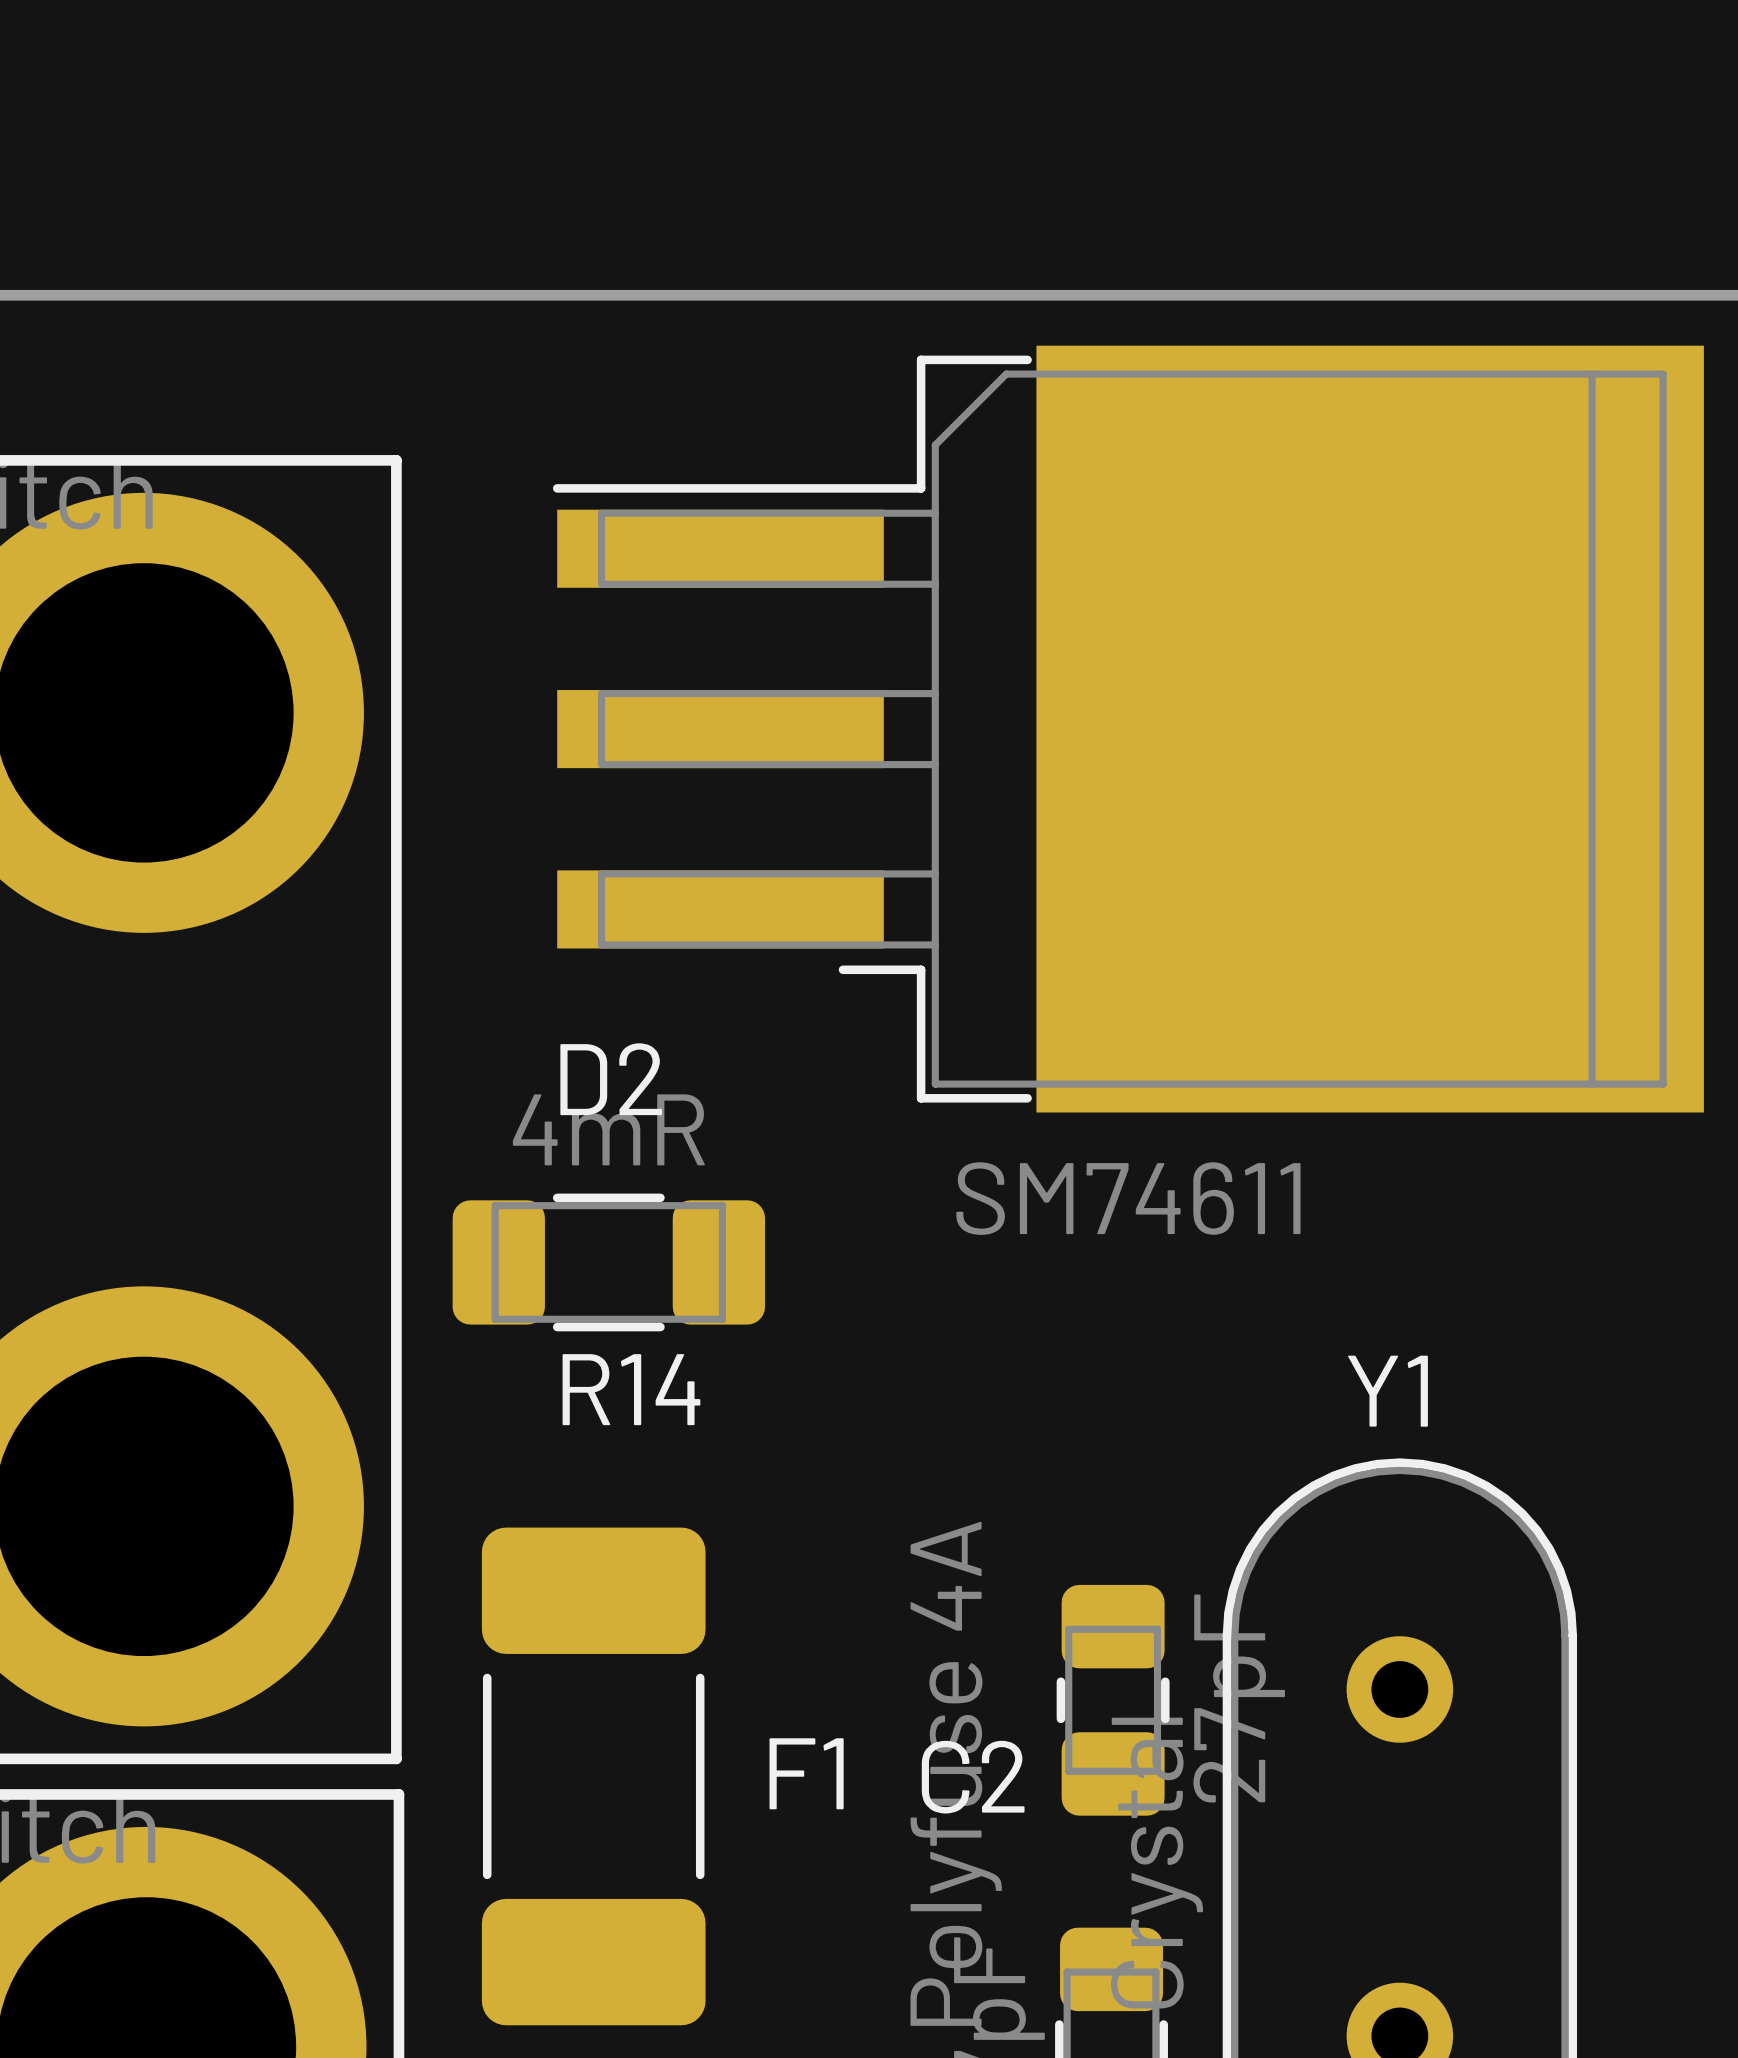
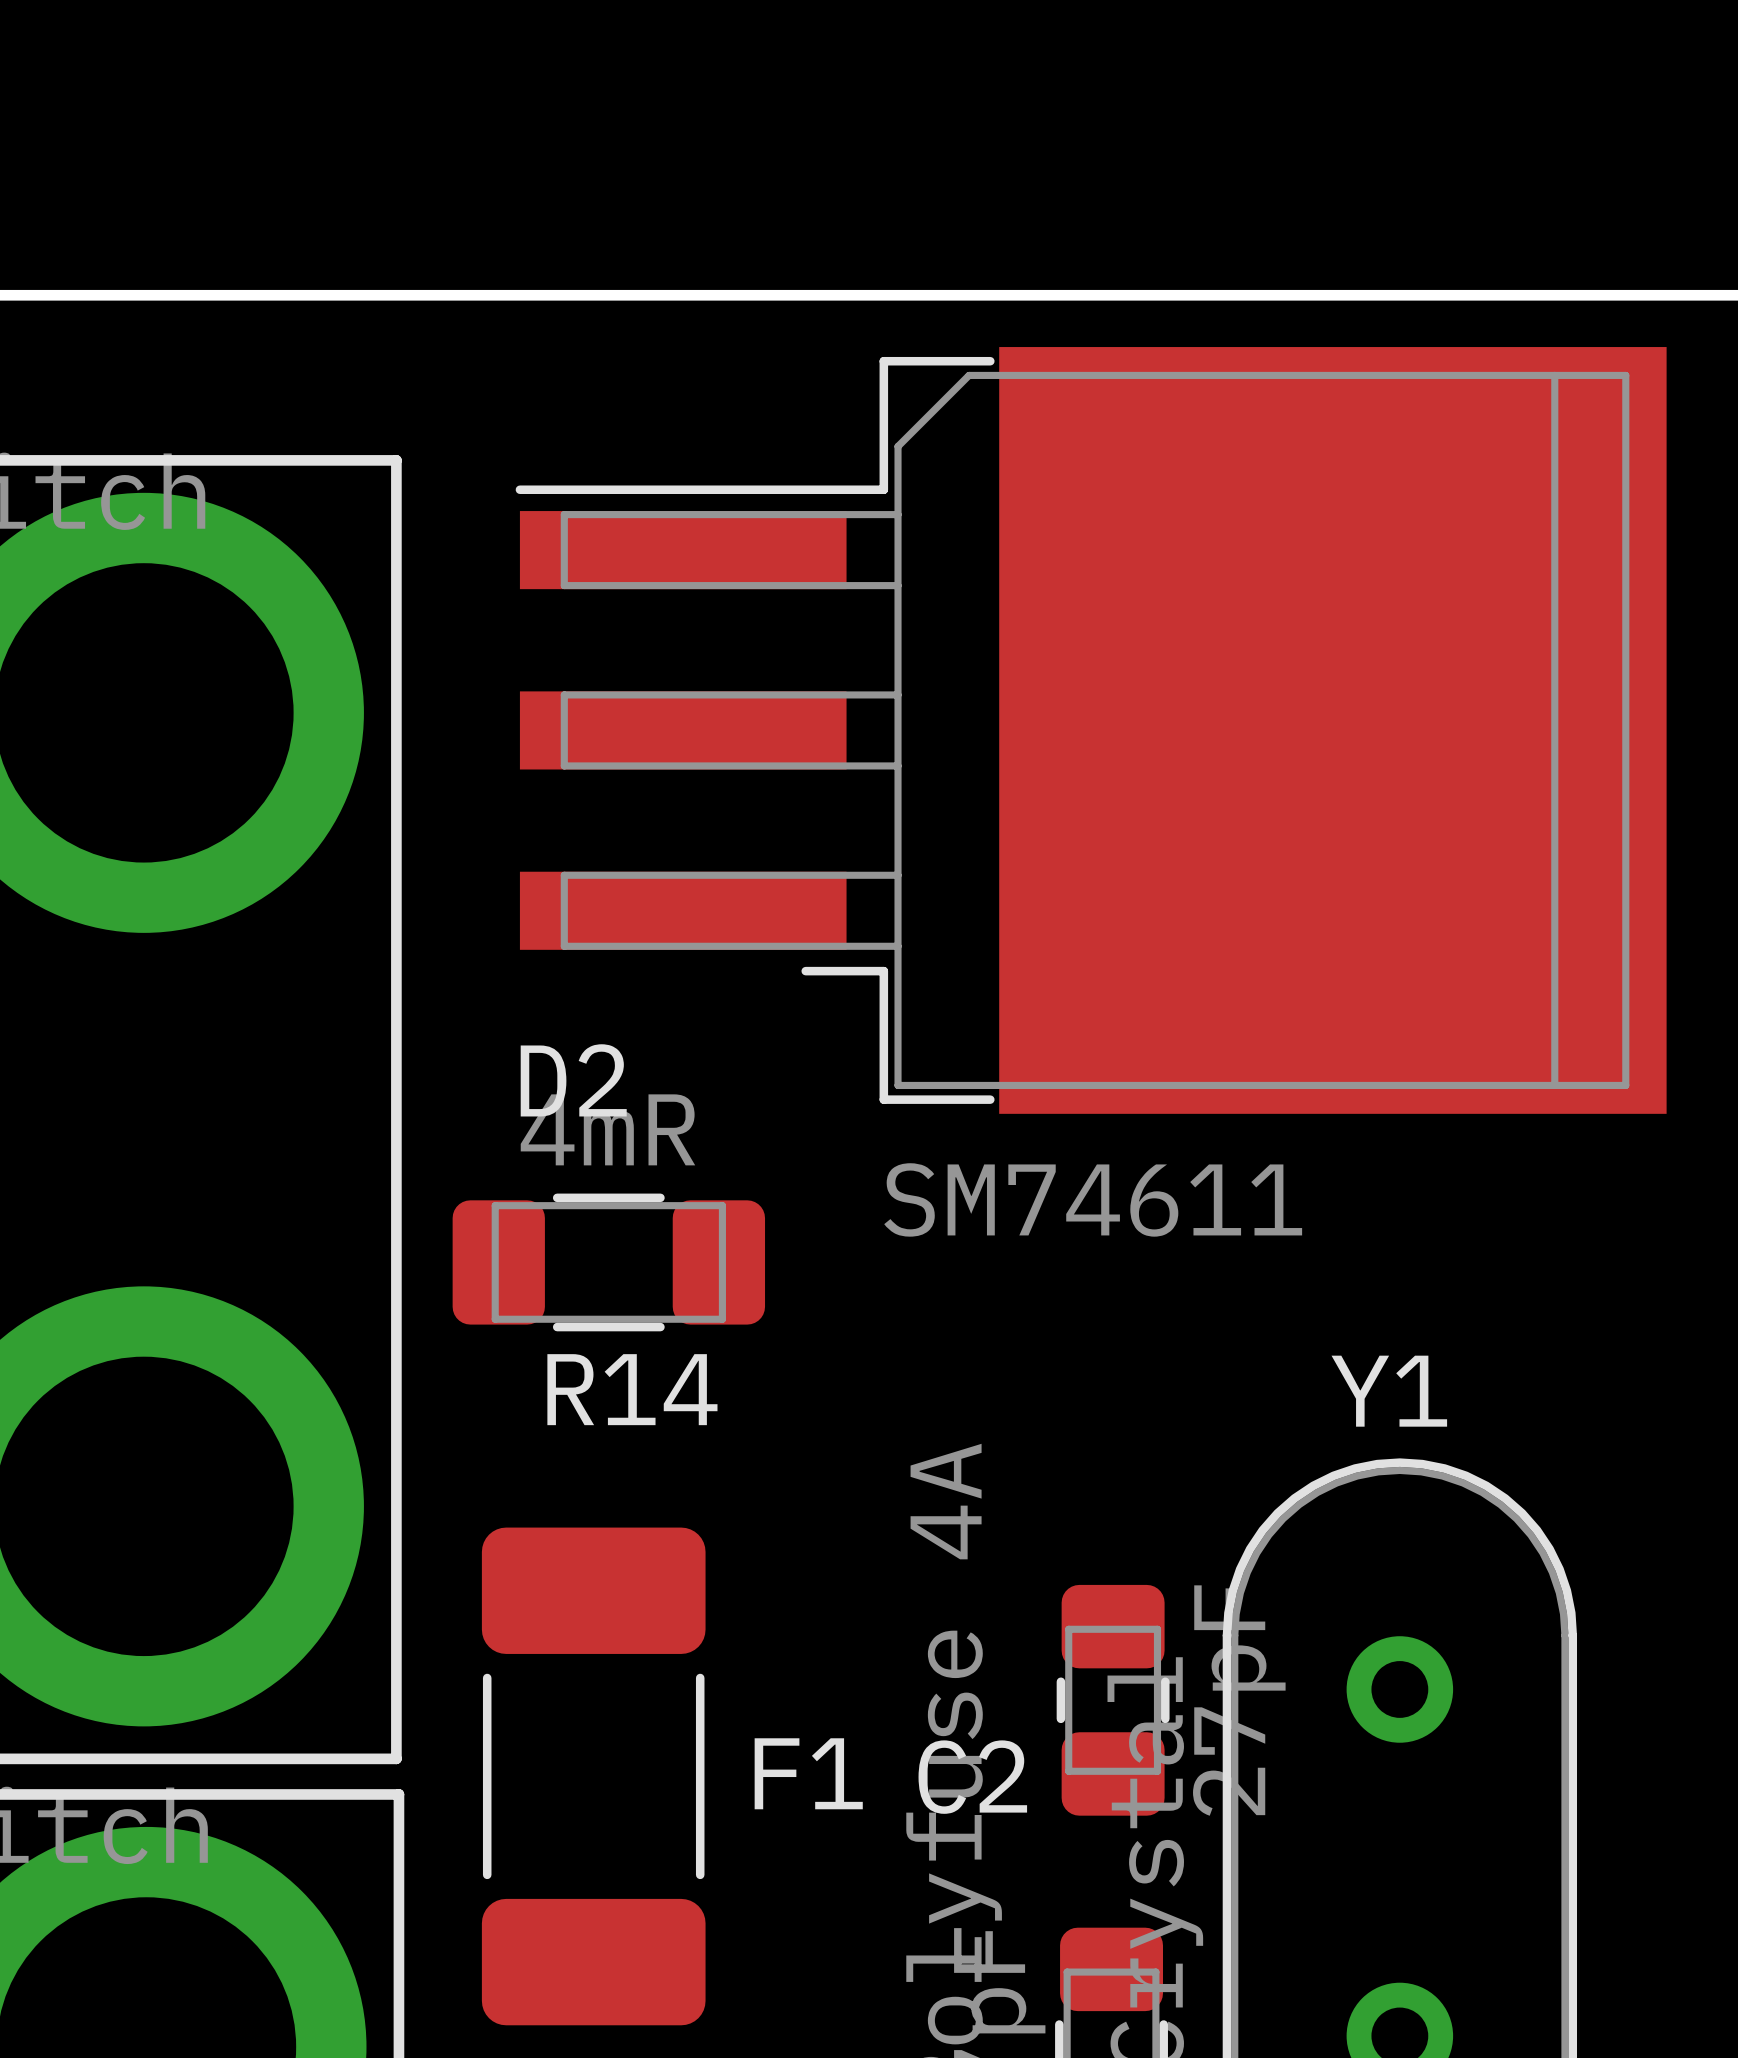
D2 position: (1128, 729) -> (1091, 730)

